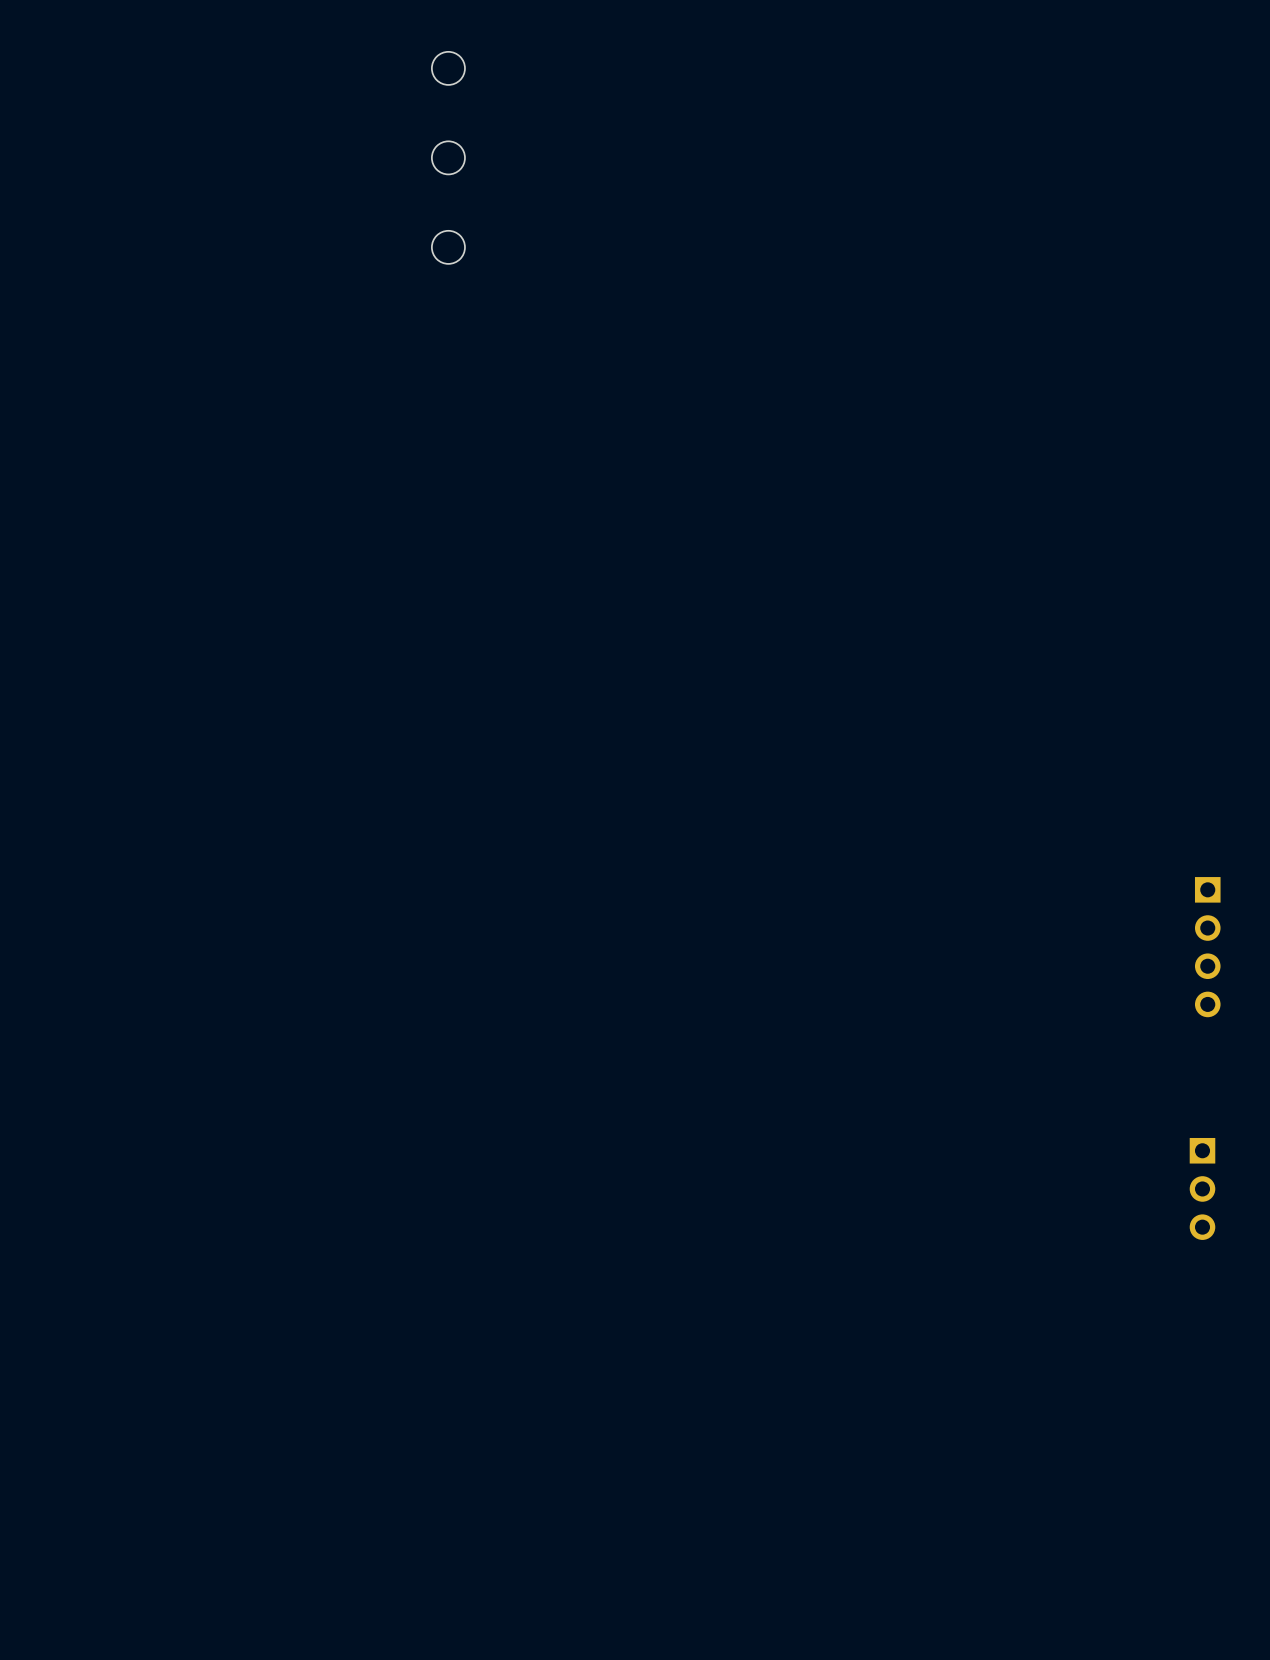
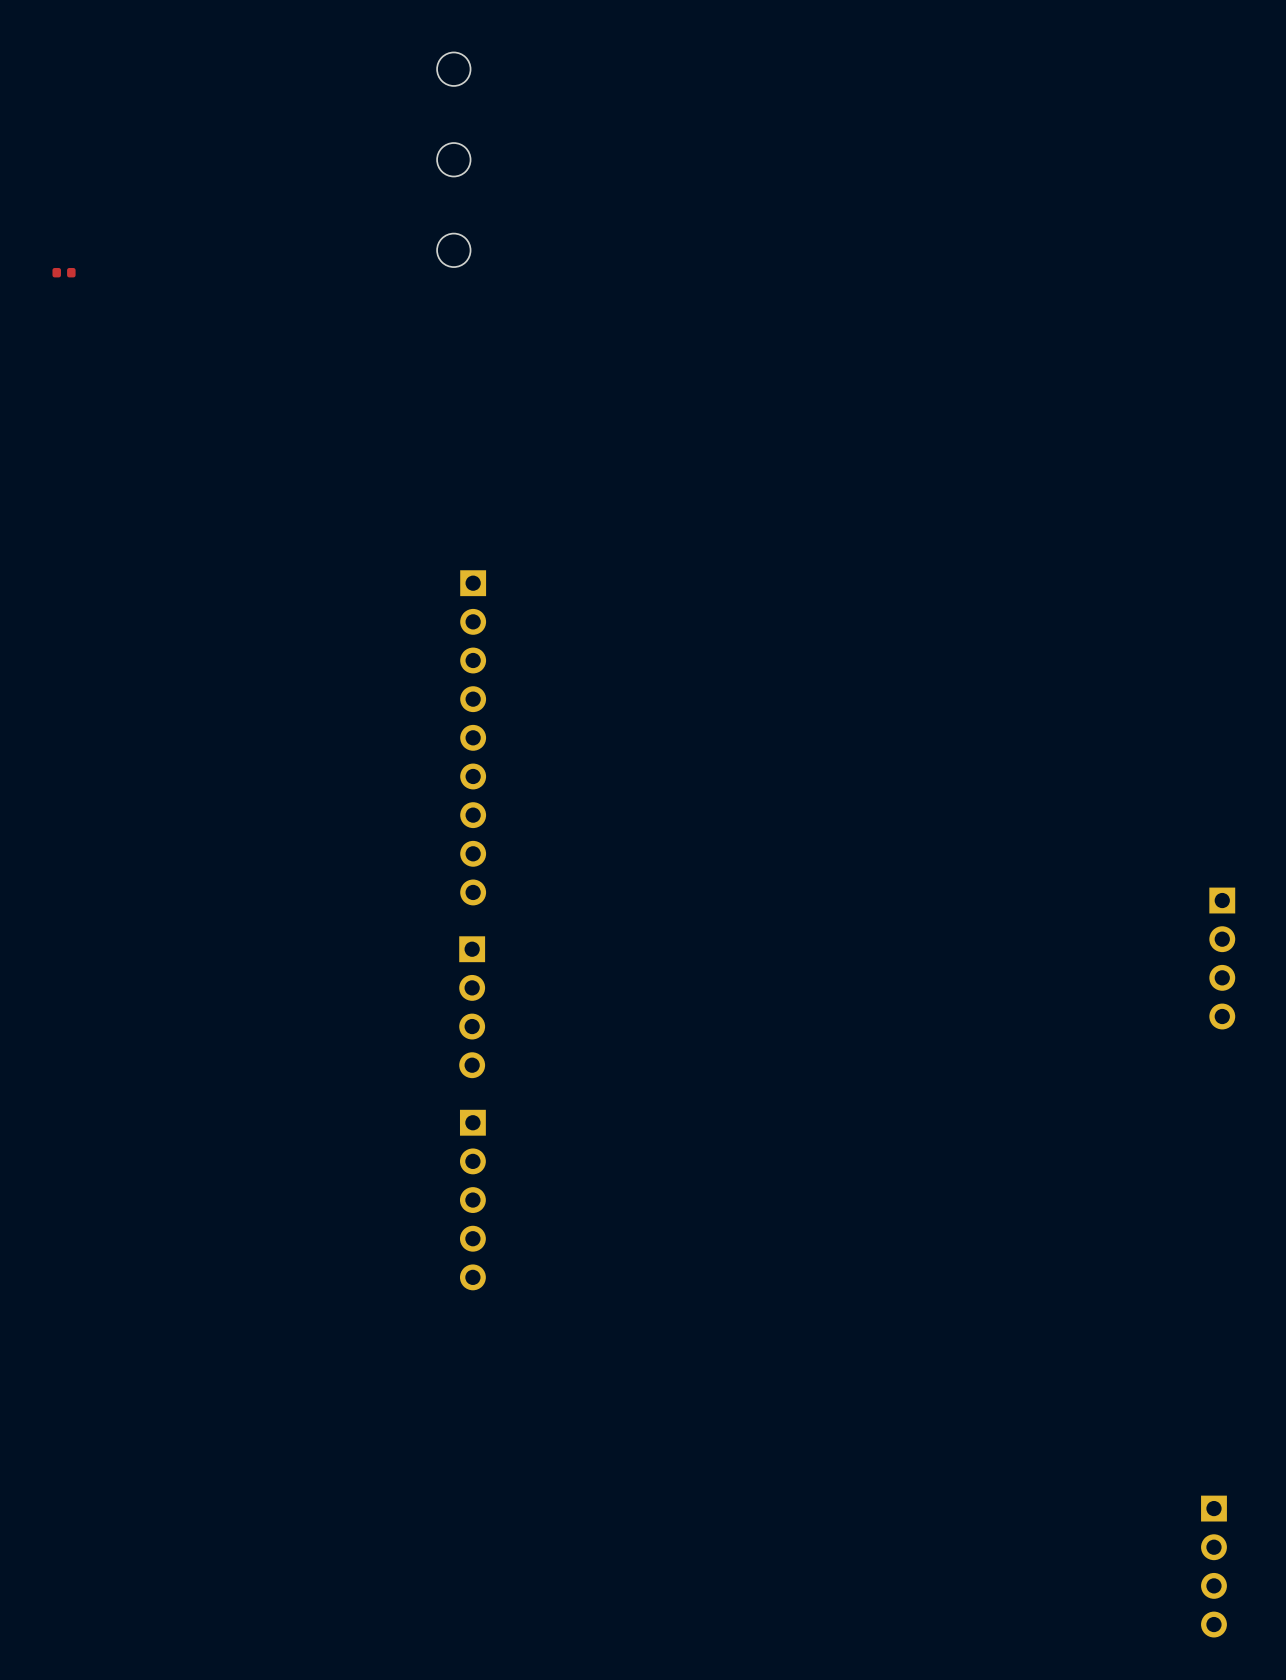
part: none -> (64, 272)
part: none -> (473, 737)
part: none -> (472, 1007)
part: none -> (472, 1200)
part: (1202, 1188) -> none
part: none -> (1213, 1566)

